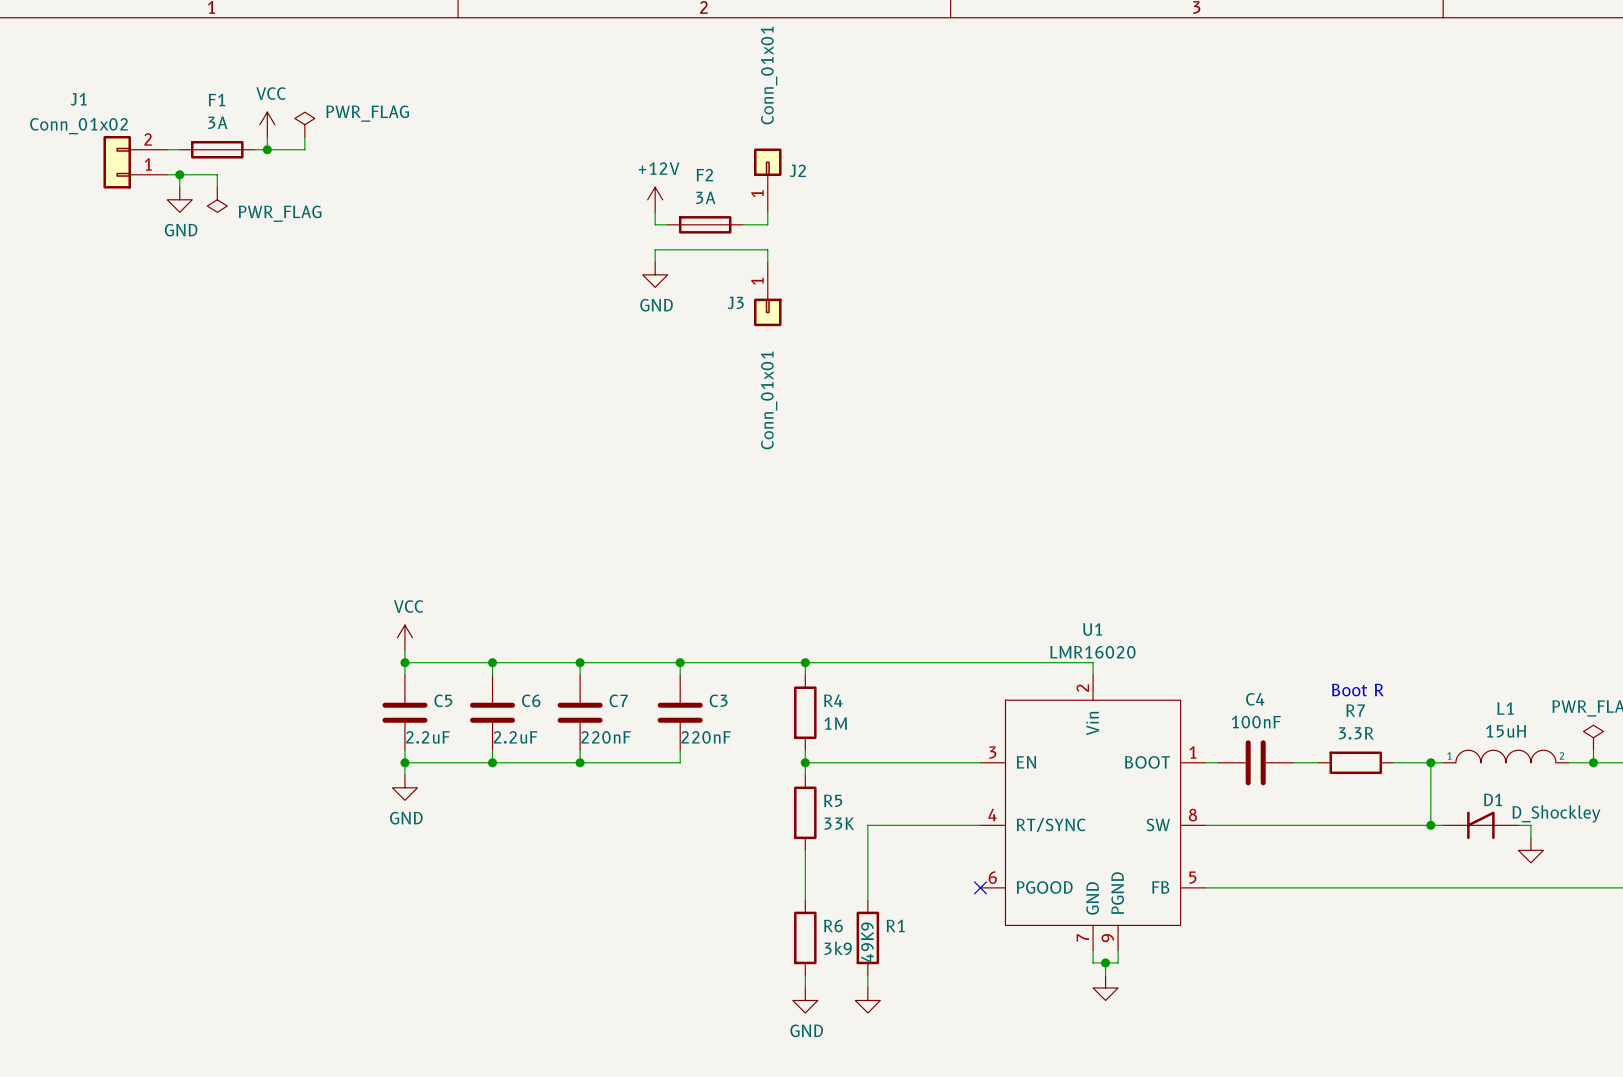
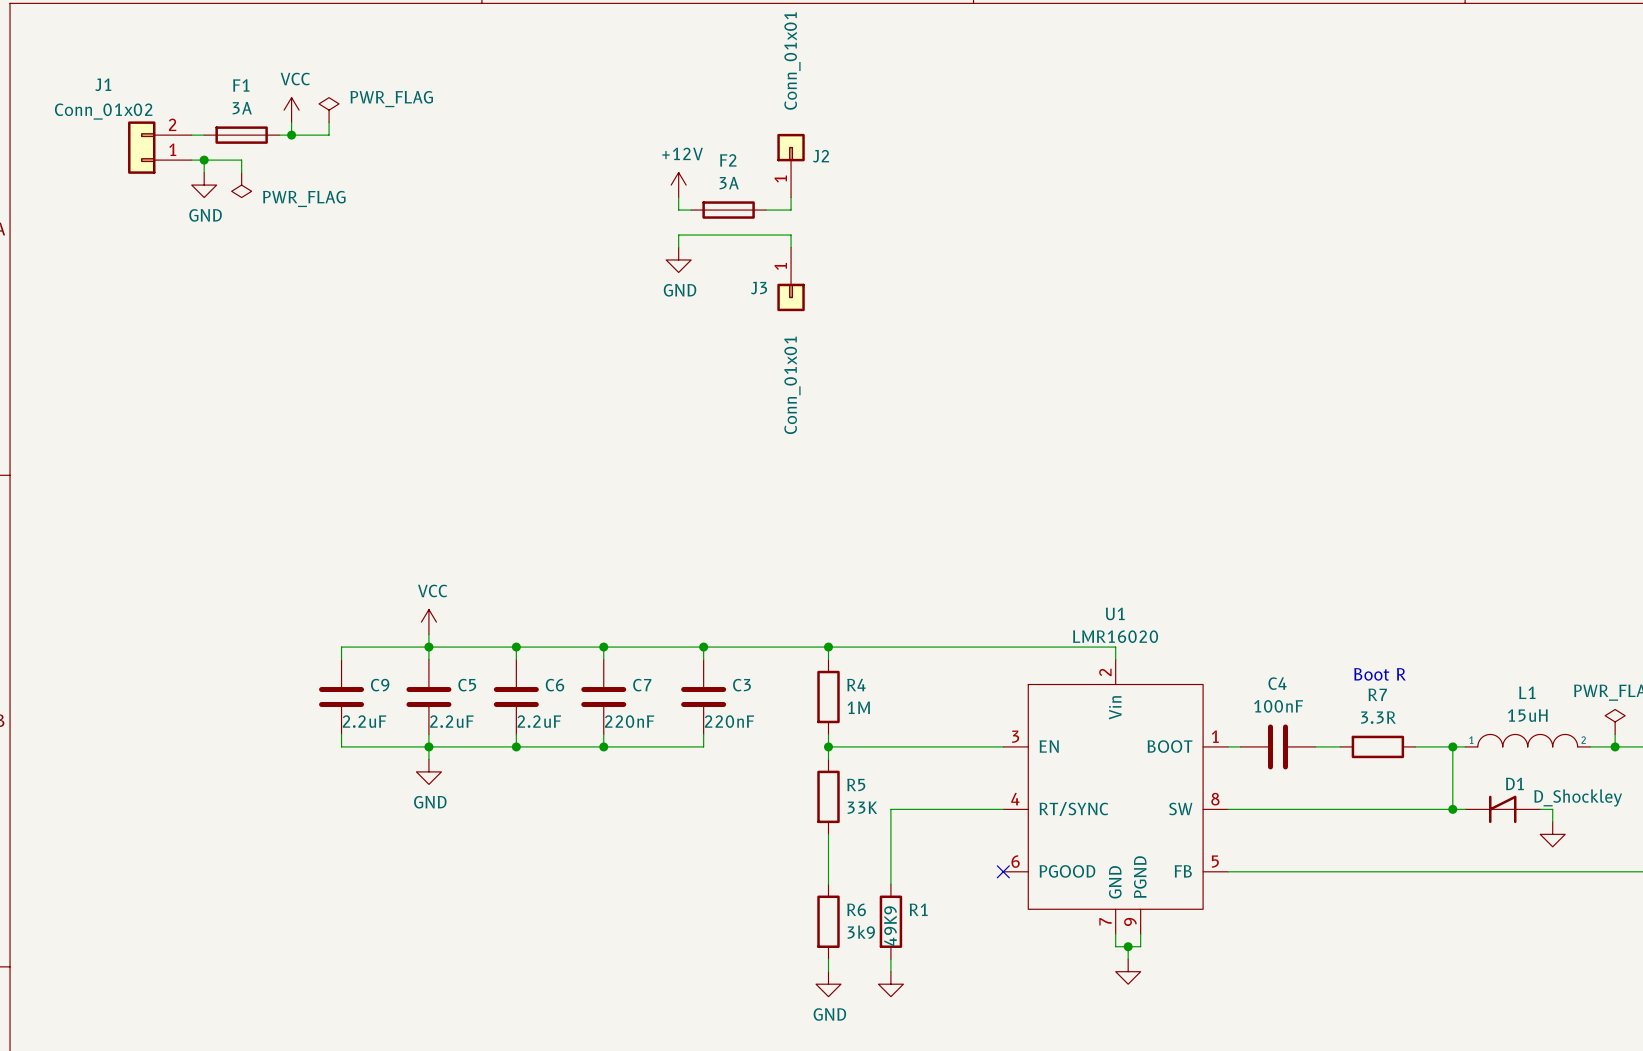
wire: none -> (428, 647) (341, 647) (341, 659)
C9: none -> 2.2uF (341, 697)
wire: none -> (341, 734) (341, 746) (428, 746)

